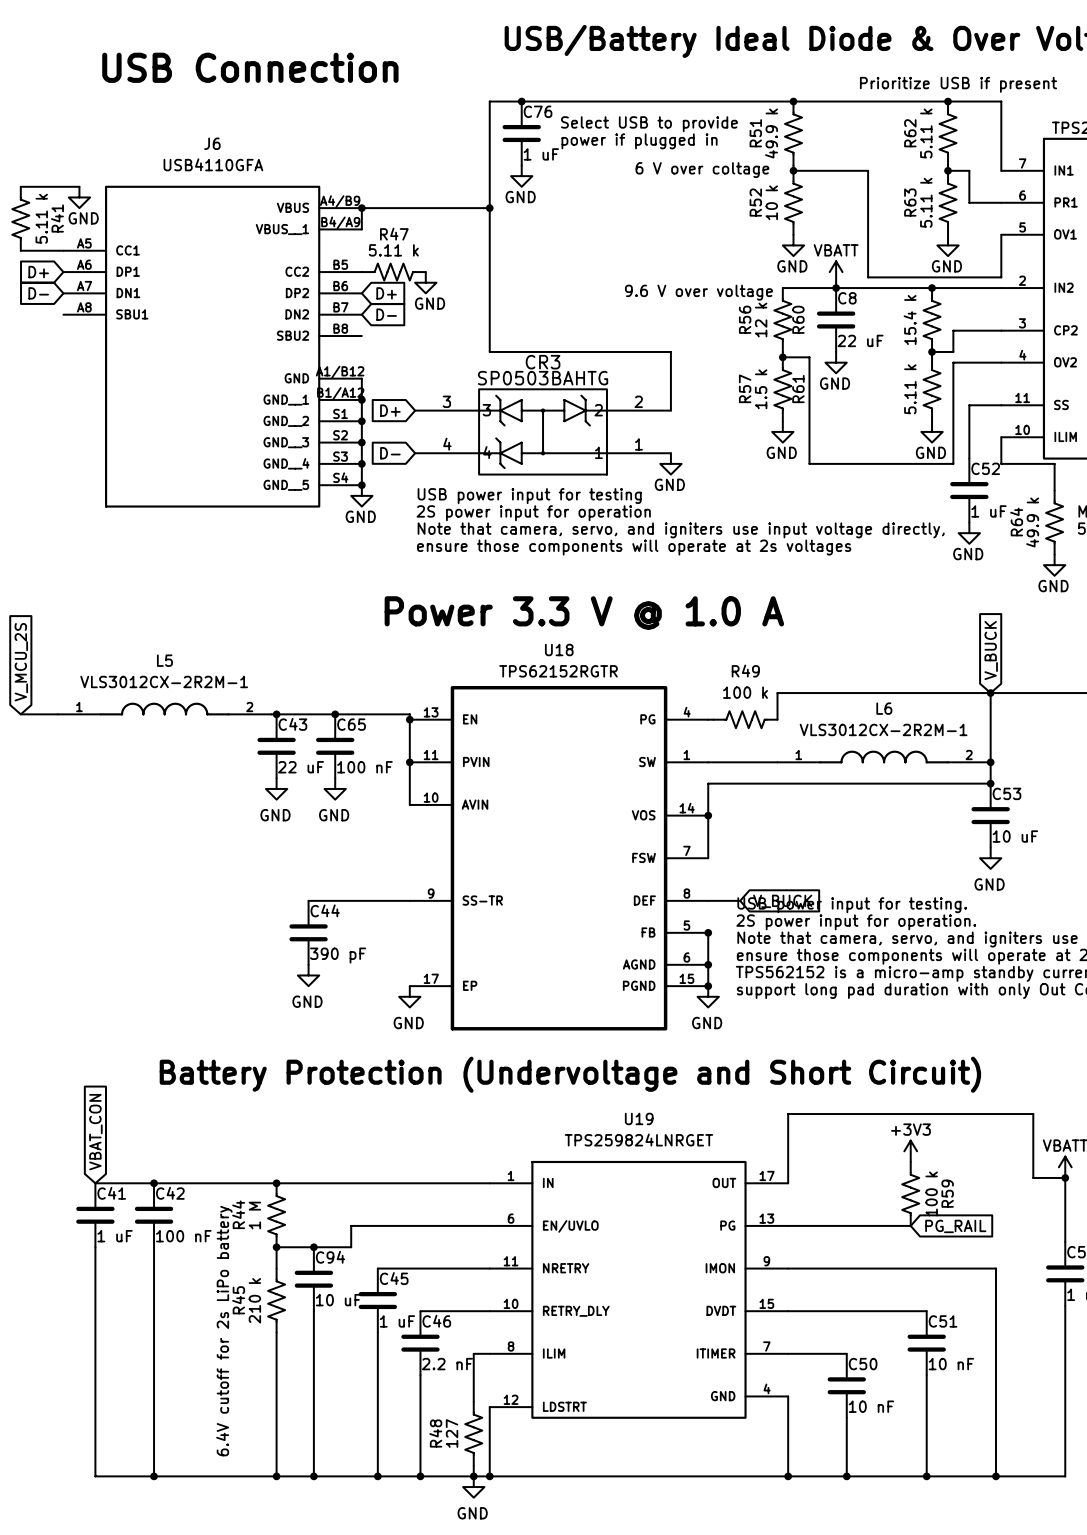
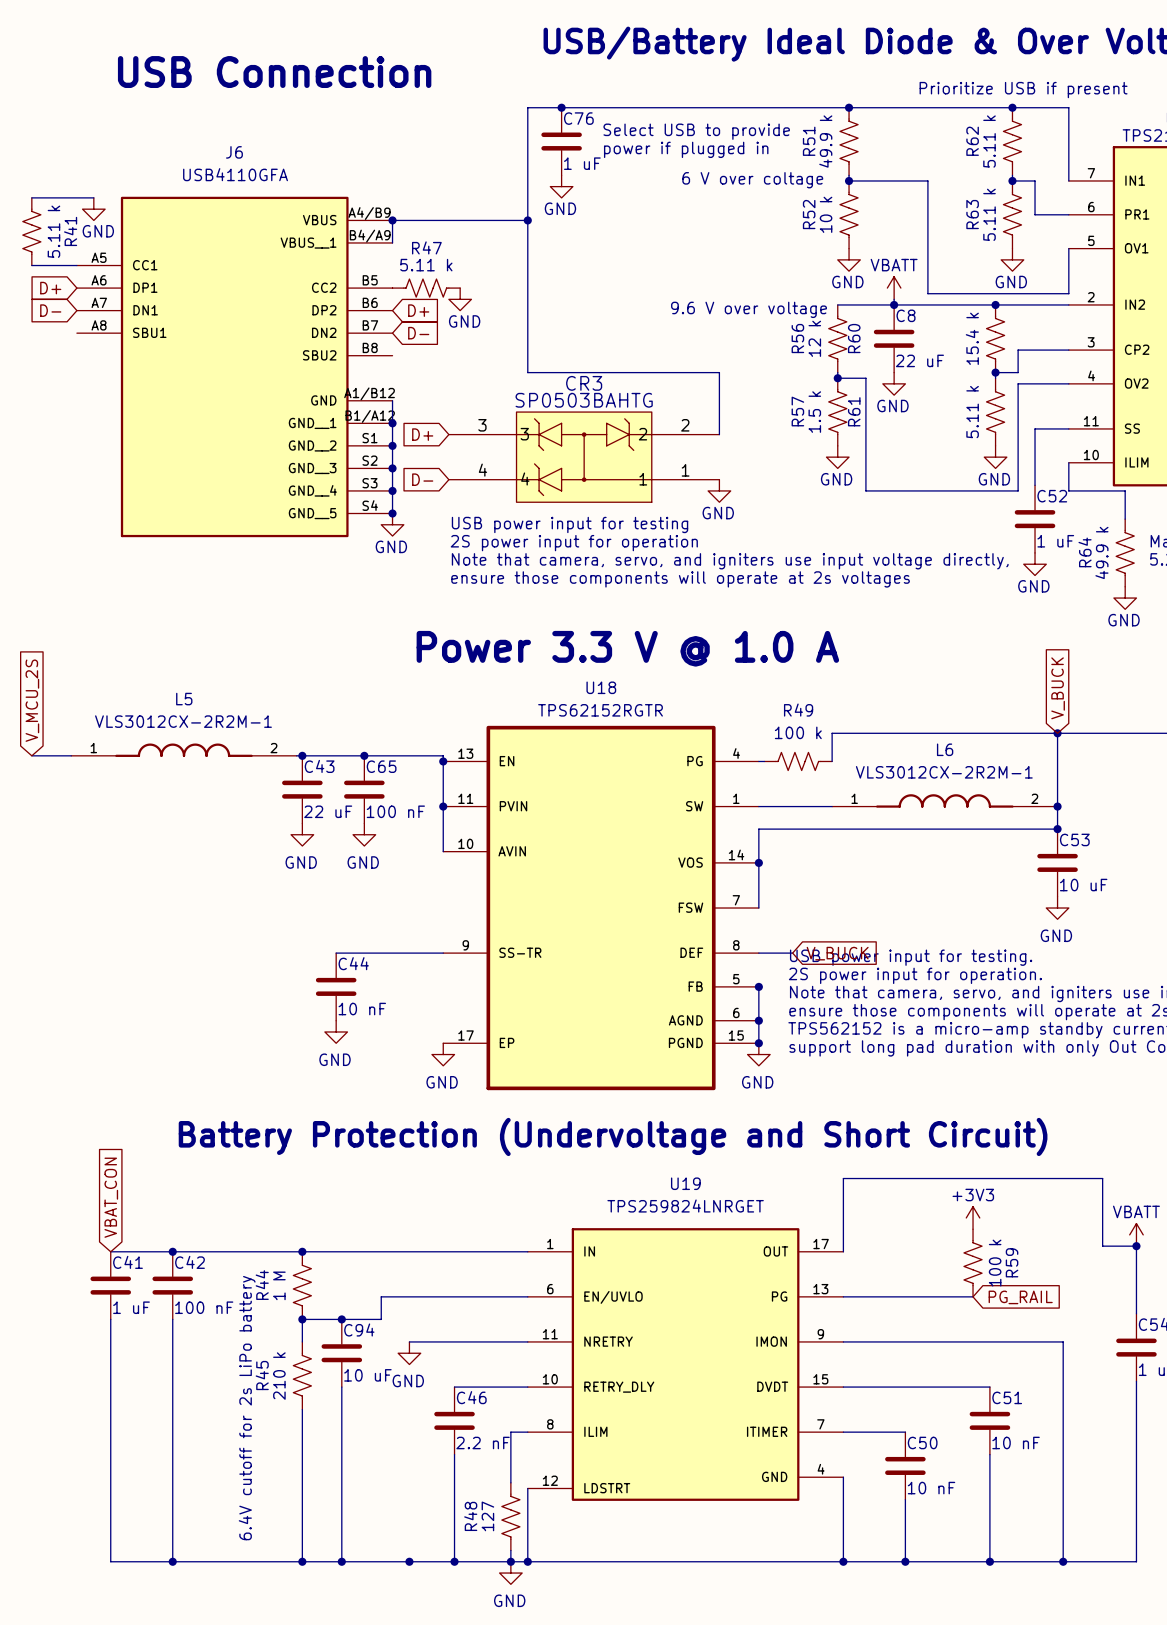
C44 value: 390 pF (338, 955) -> 10 nF (362, 1009)
power symbol: none -> GND (409, 1353)
C45: 1 uF (377, 1300) -> none
wire: (377, 1332) (377, 1476) -> none

